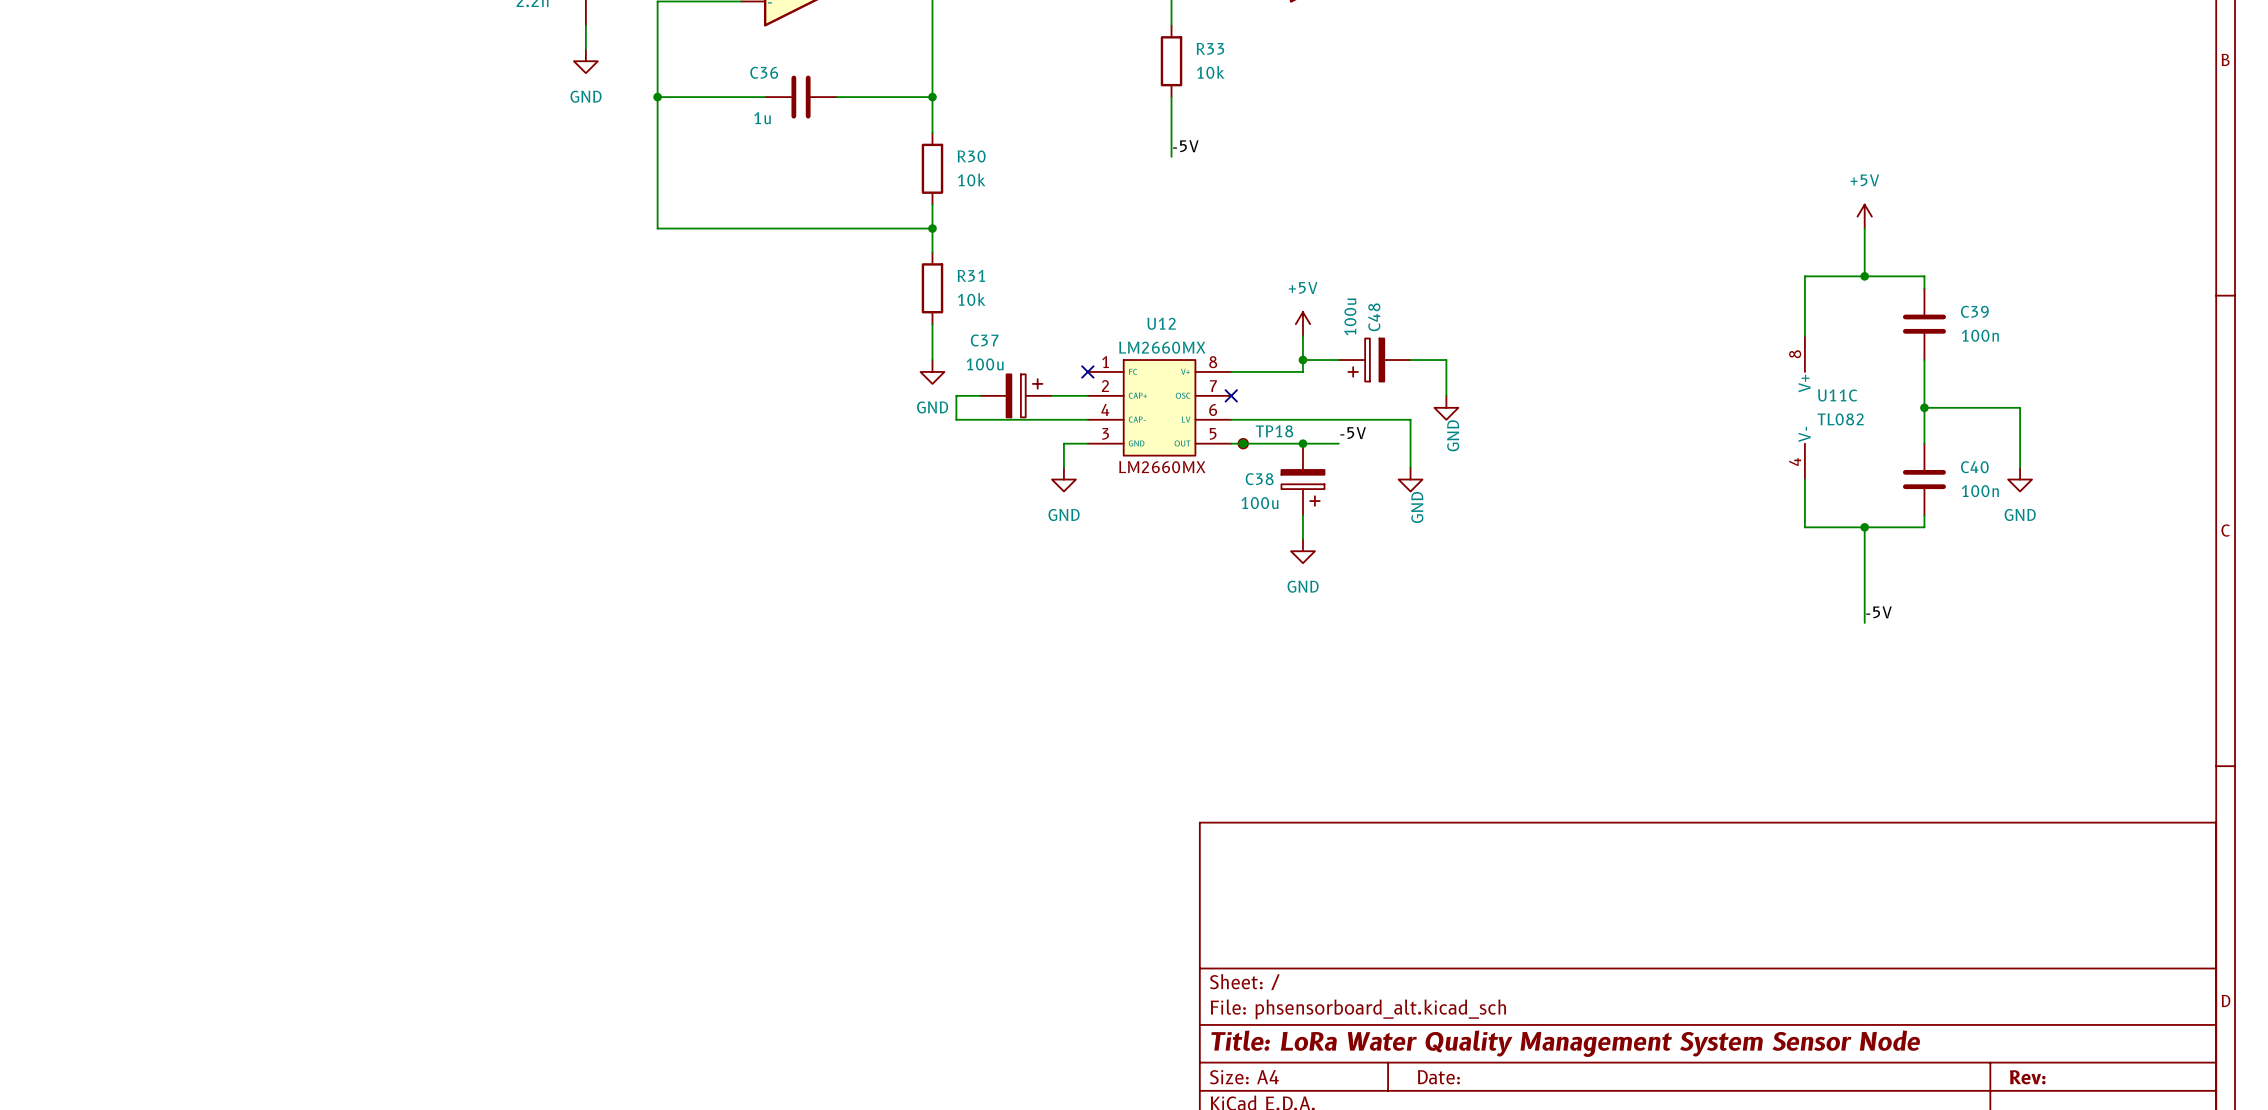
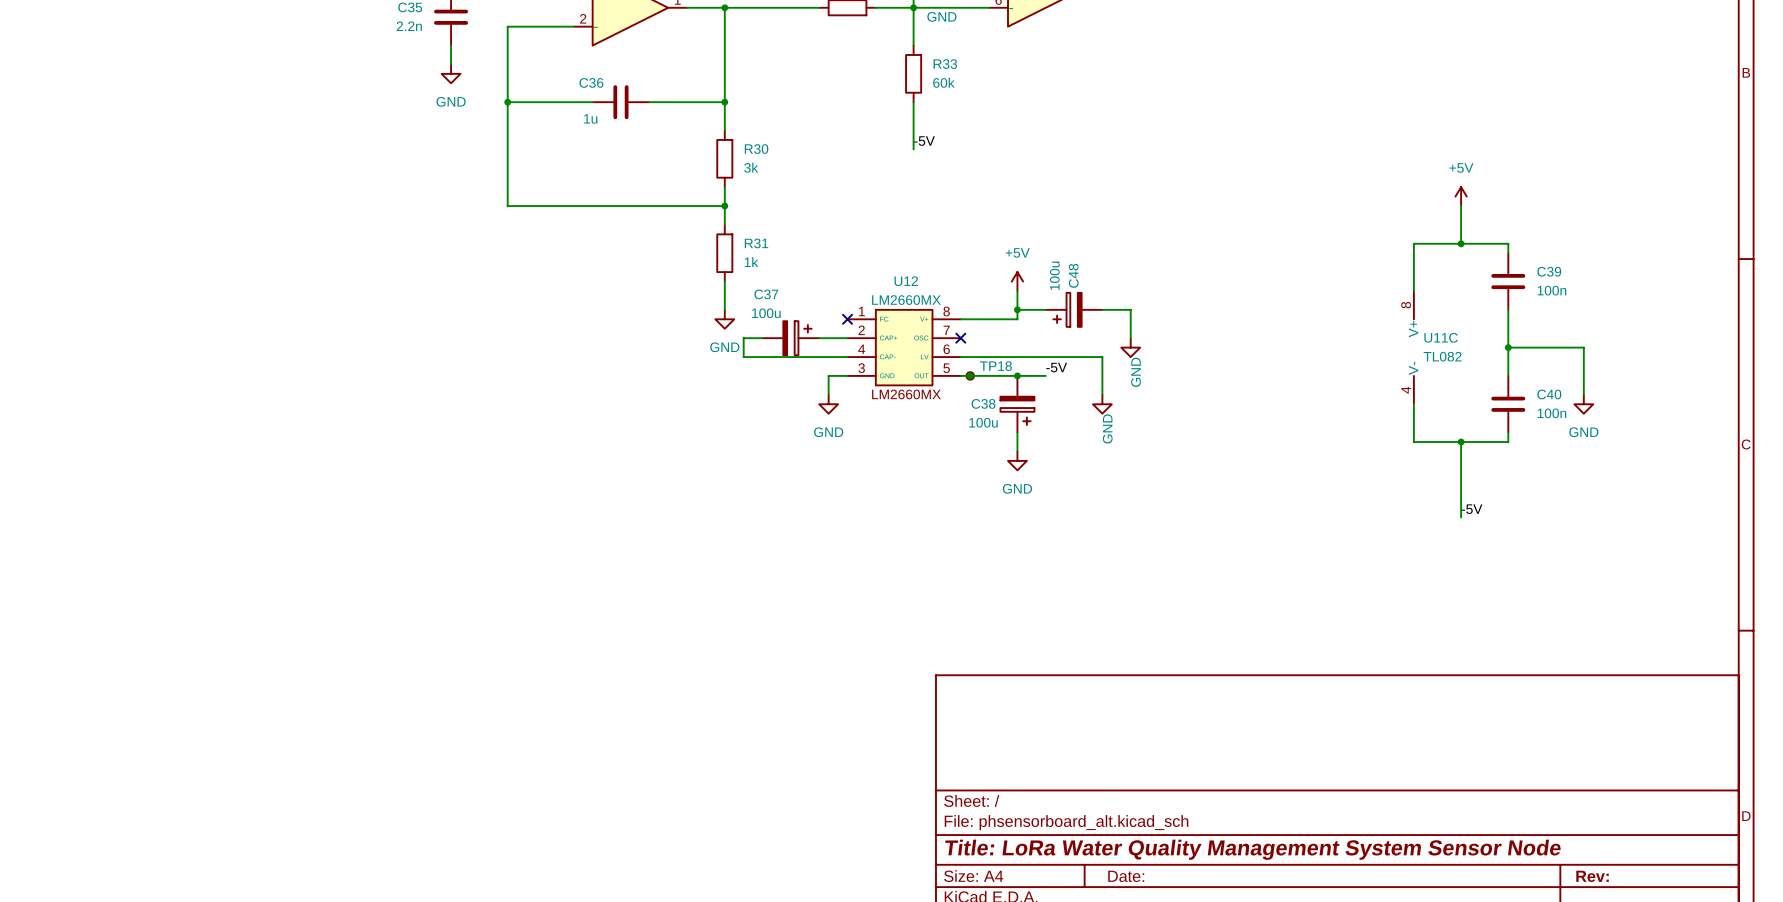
R33 value: 10k (1210, 72) -> 60k (943, 82)
R30 value: 10k (971, 179) -> 3k (751, 167)
R31 value: 10k (971, 299) -> 1k (751, 262)

